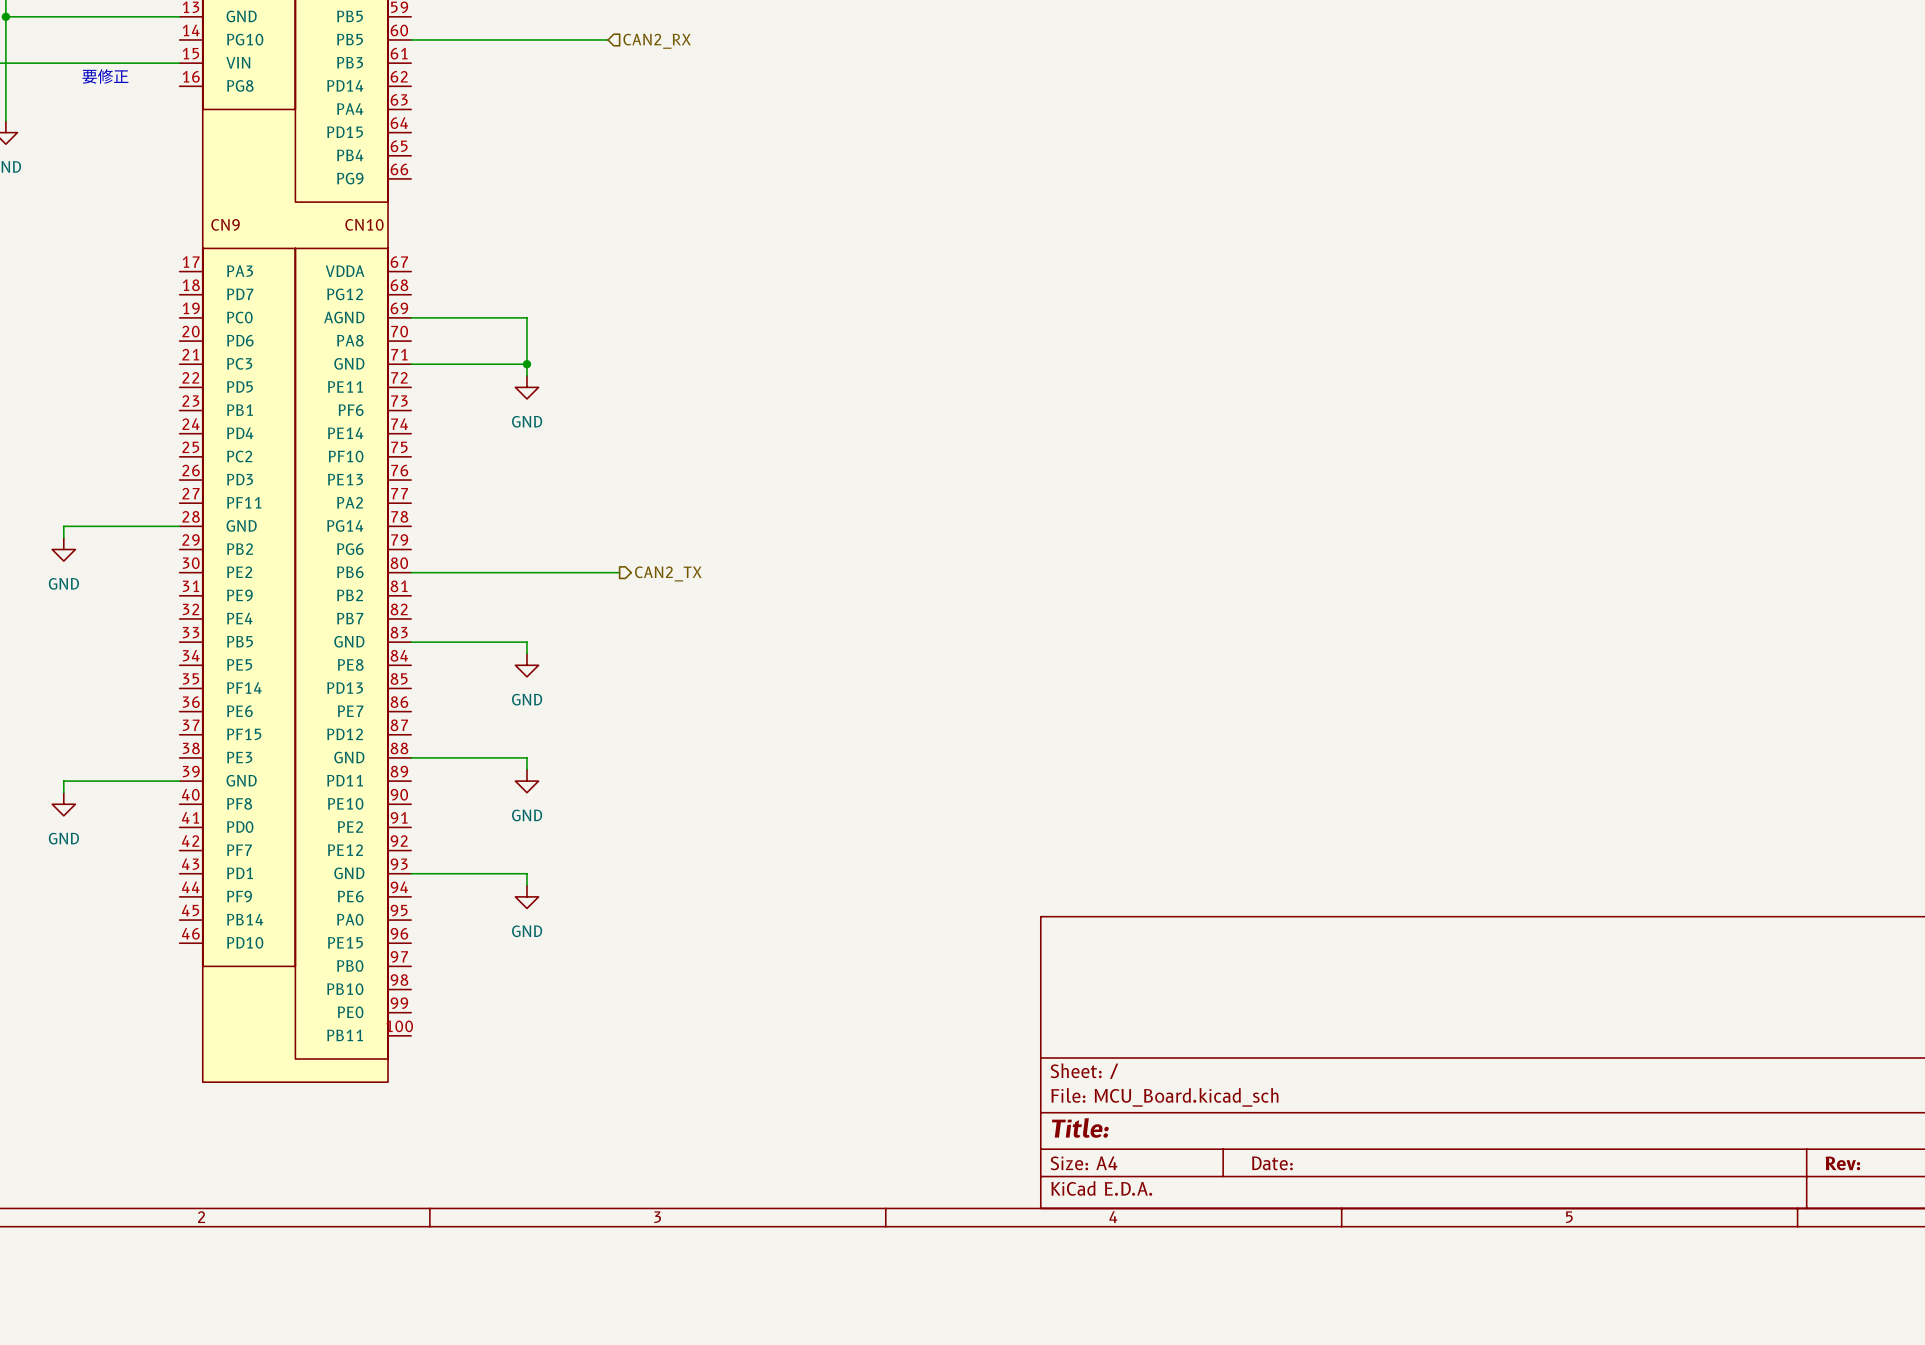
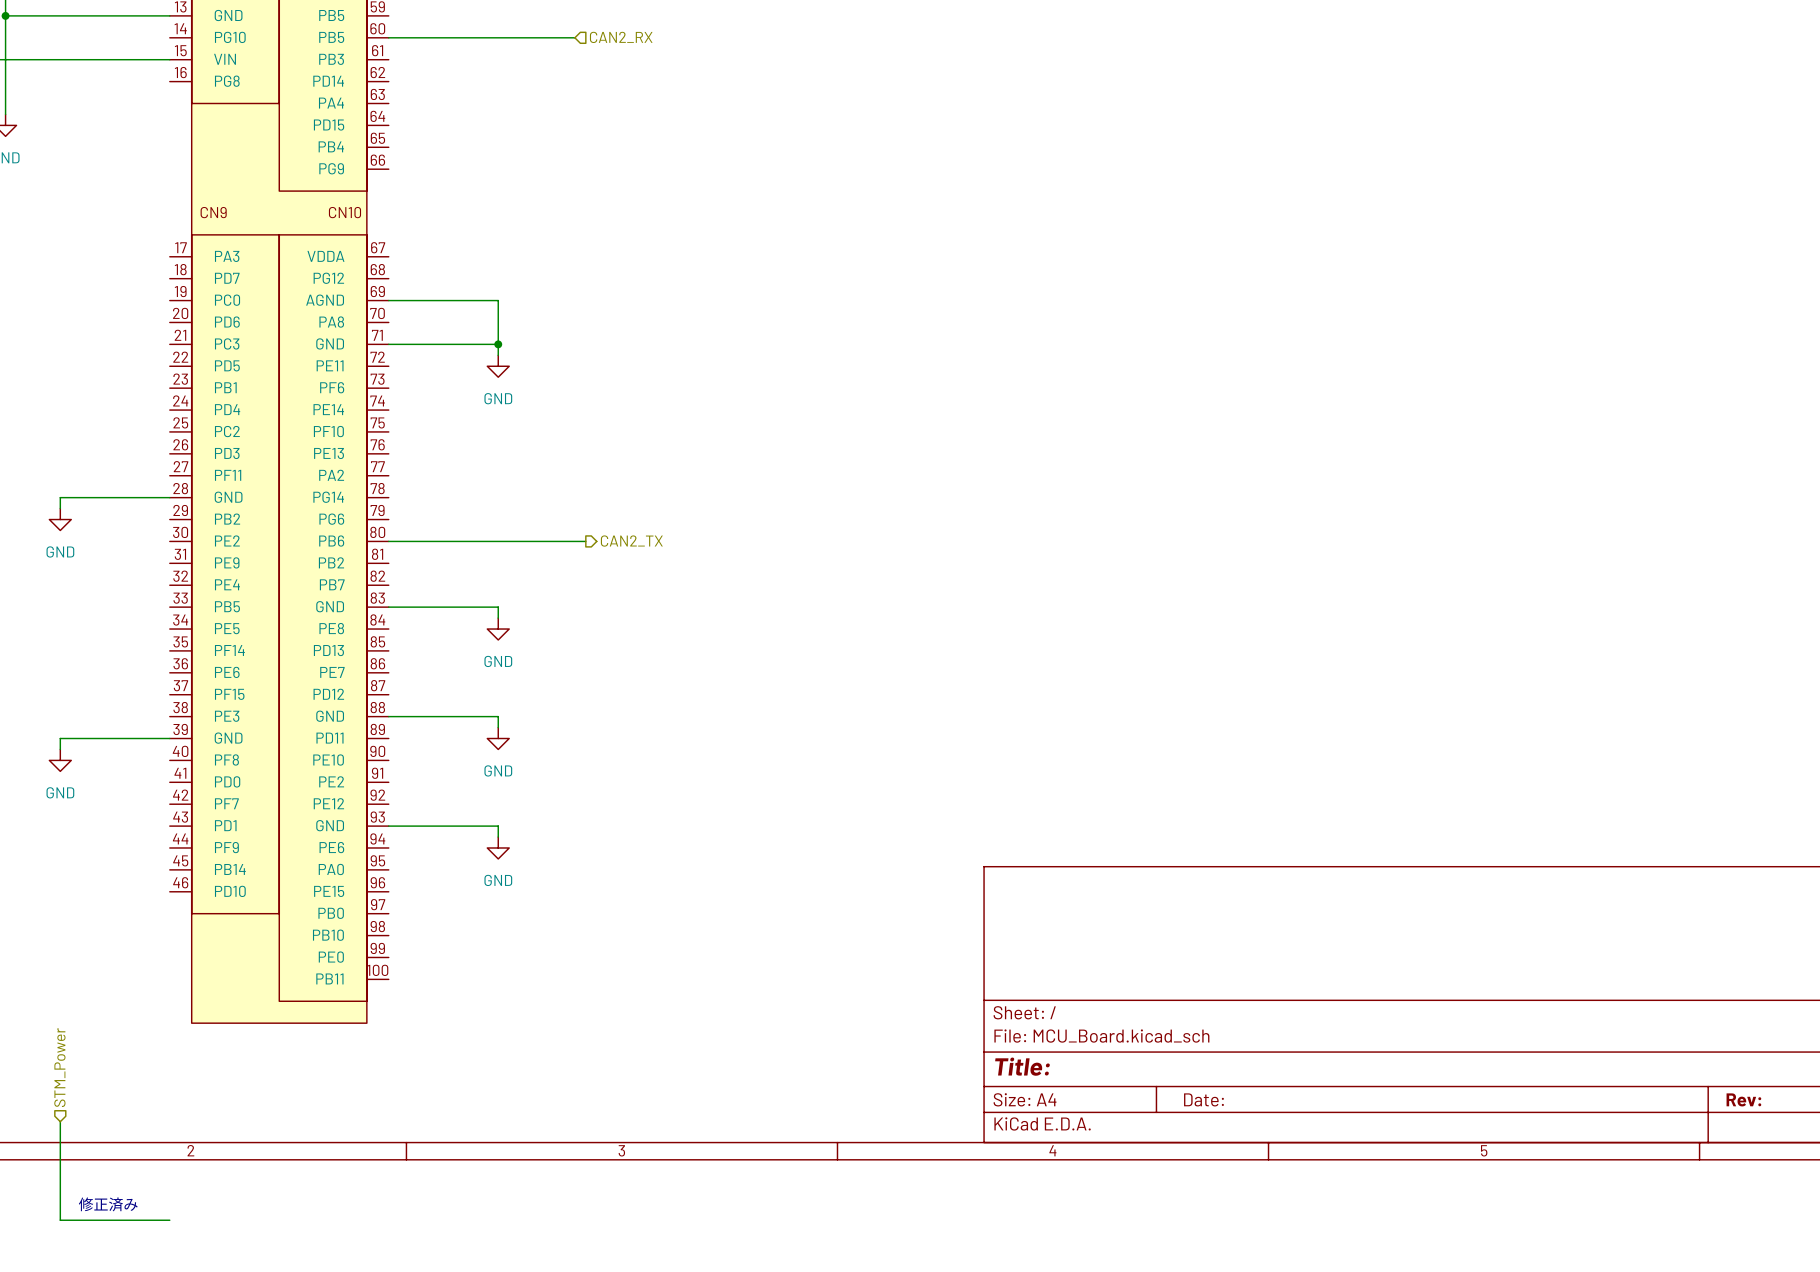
text: 要修正 (105, 76) -> none
hierarchical label: none -> STM_Power (59, 1067)
wire: none -> (60, 1121) (60, 1220) (169, 1220)
text: none -> 修正済み (108, 1204)

